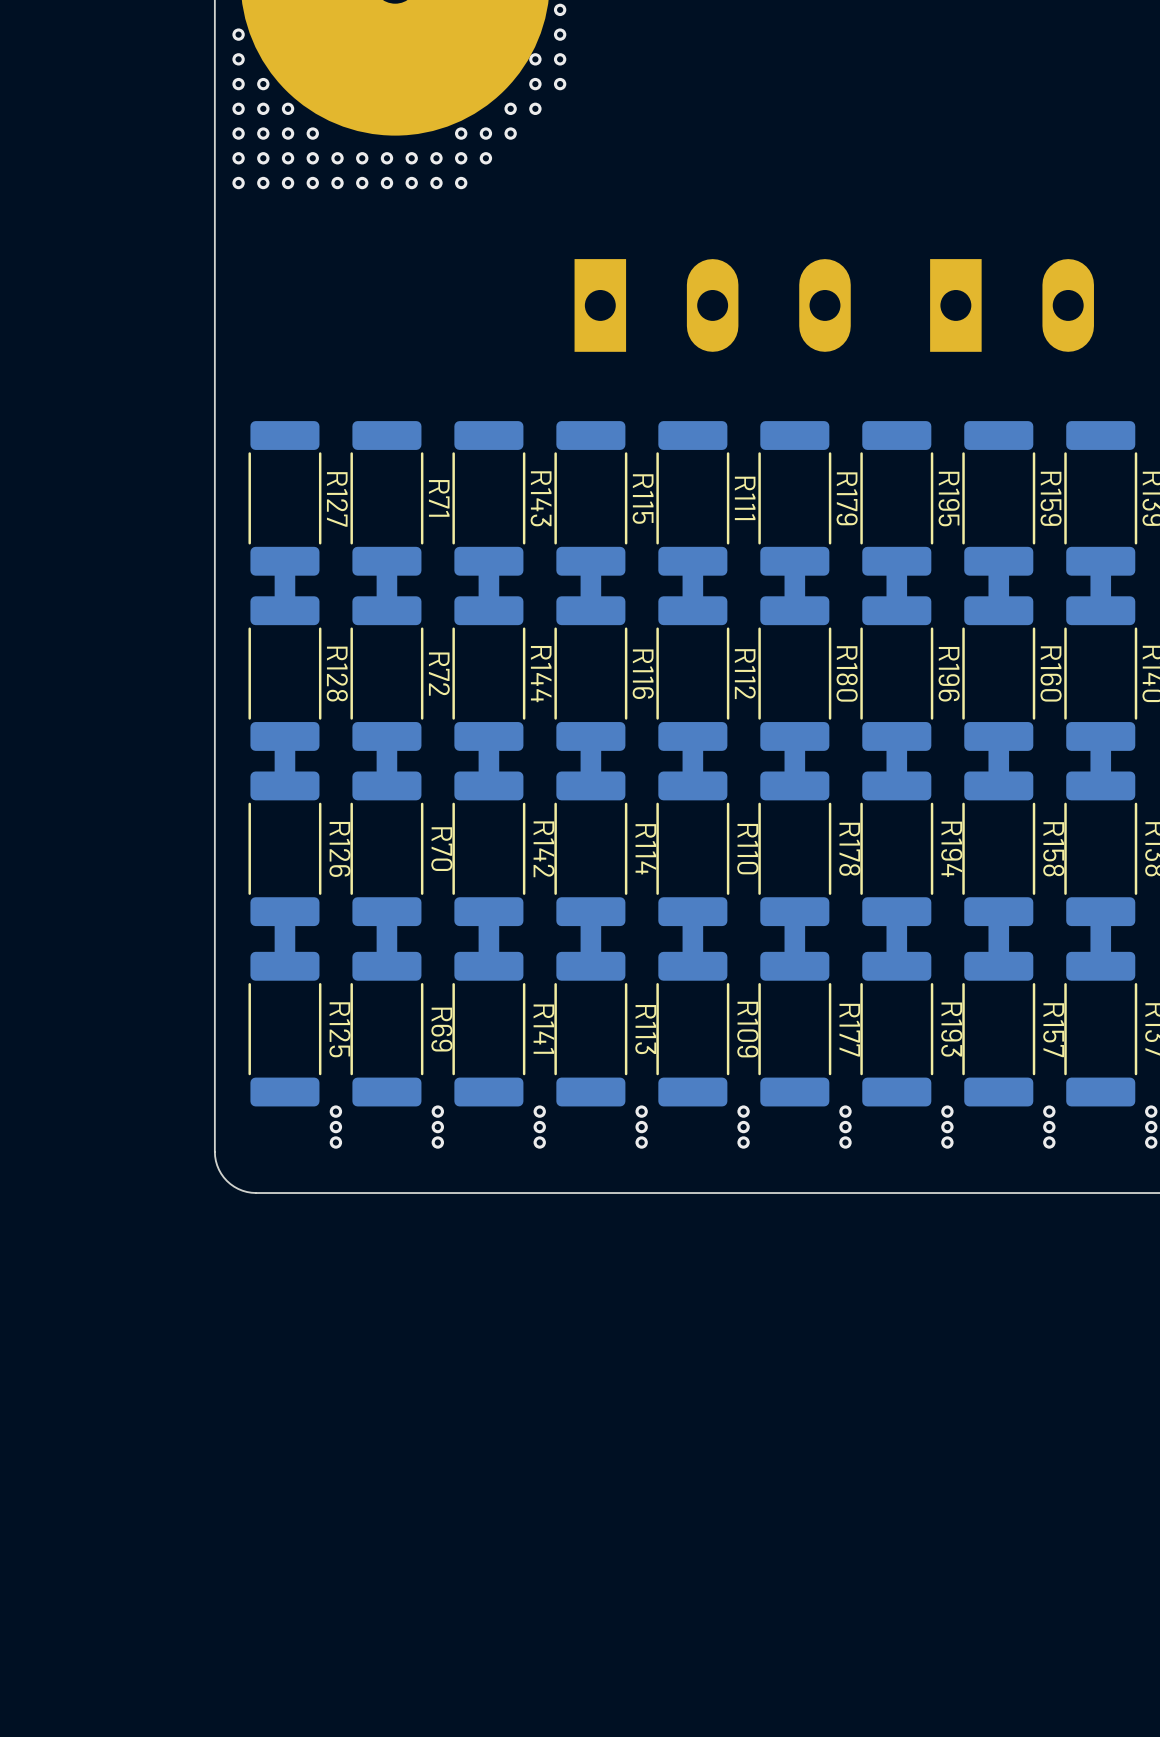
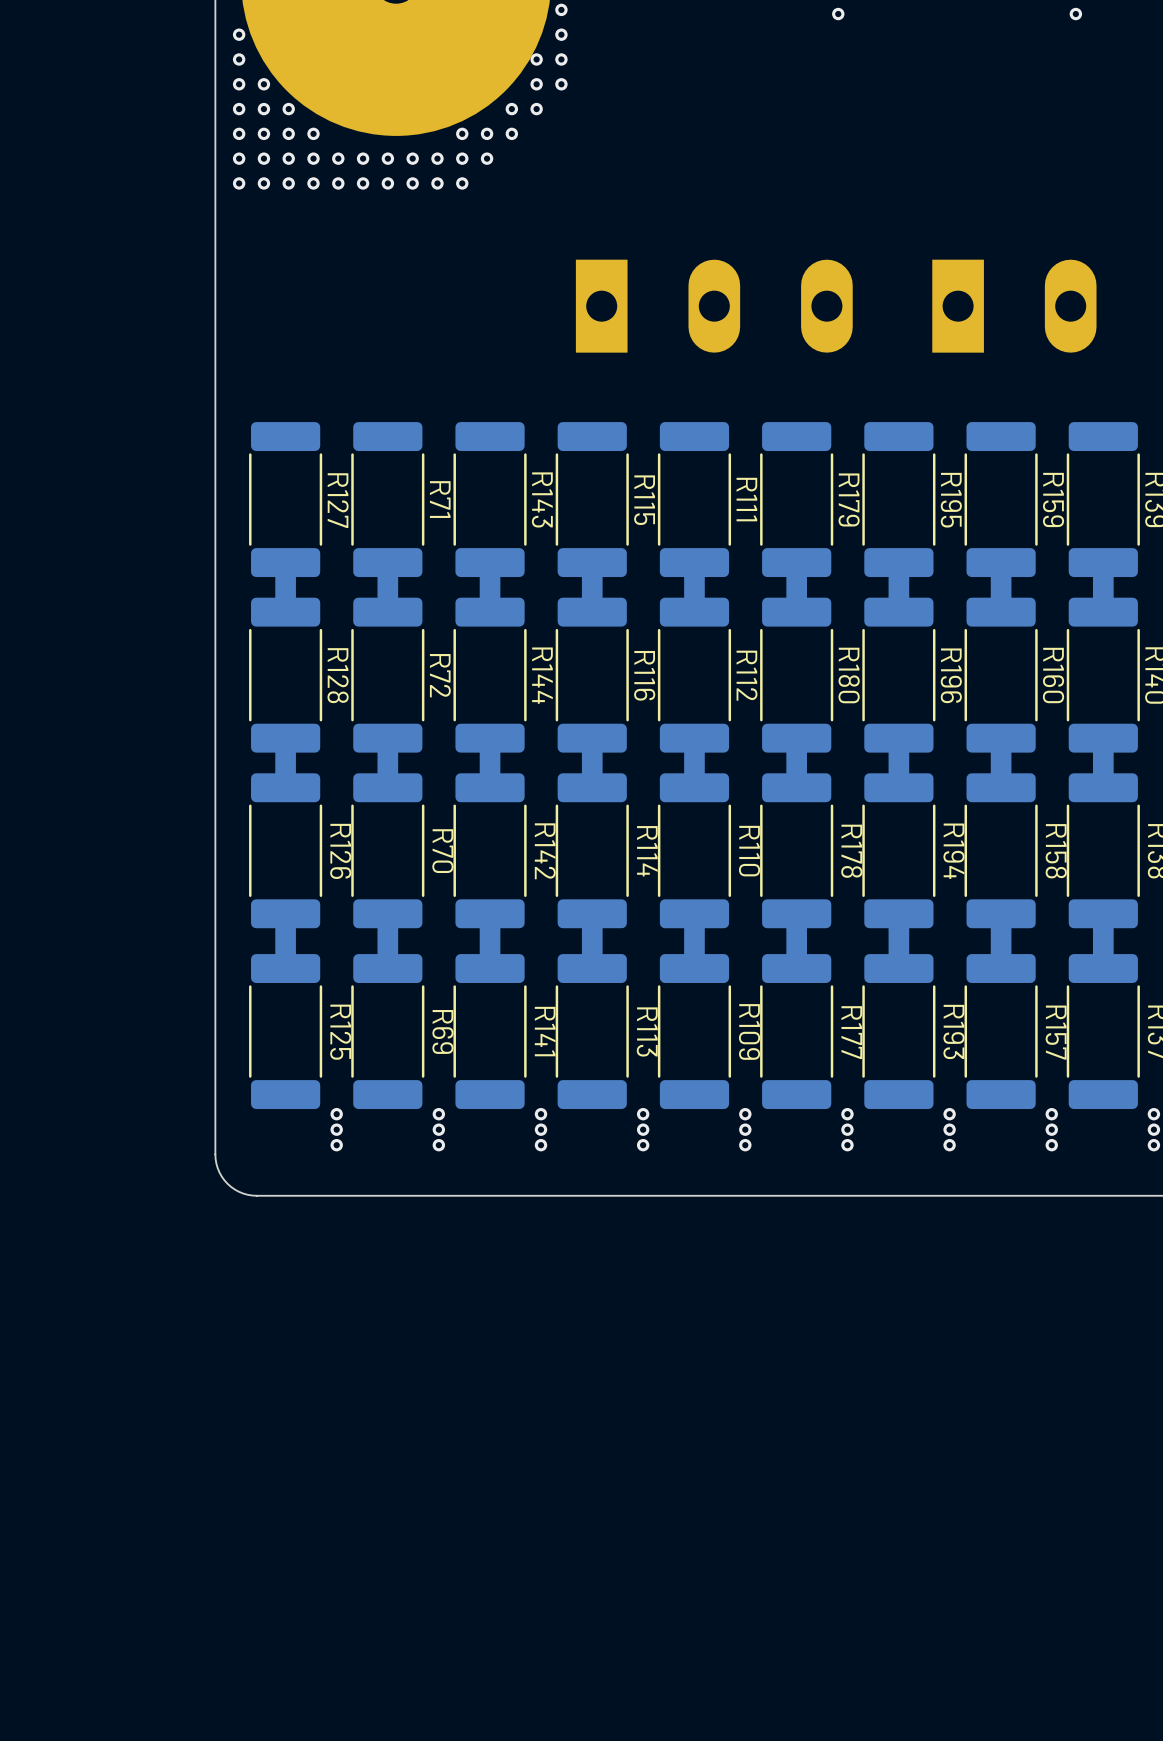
via: none -> (838, 14)
via: none -> (1075, 14)

